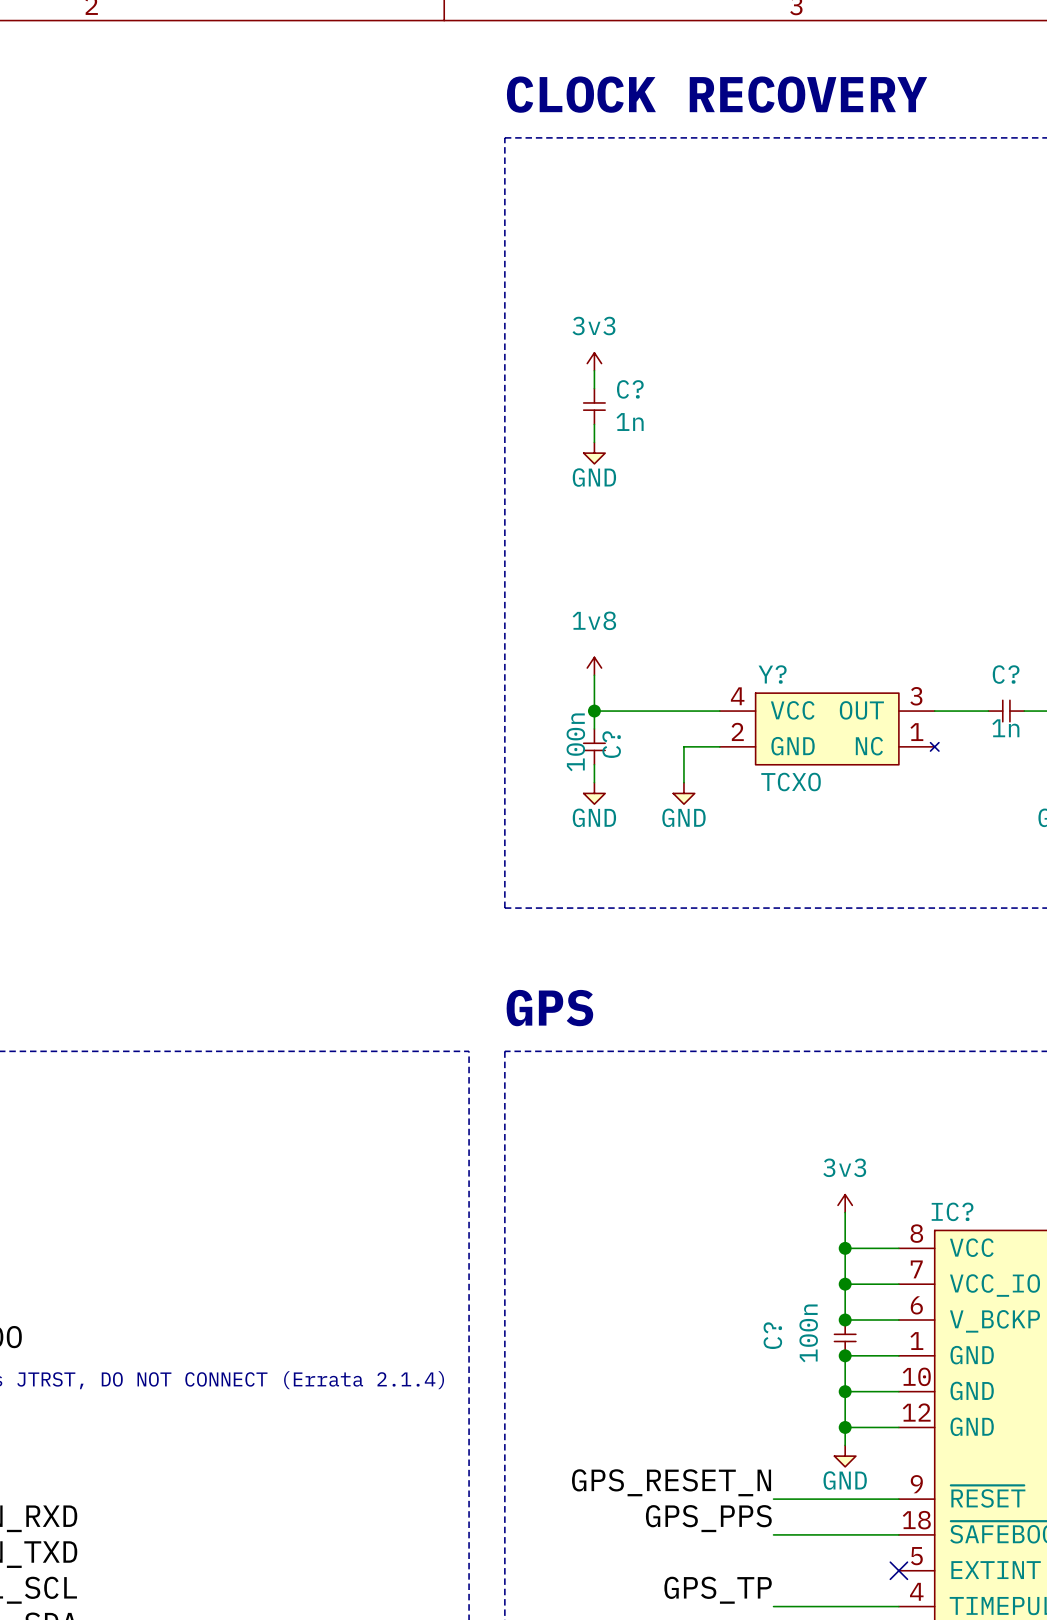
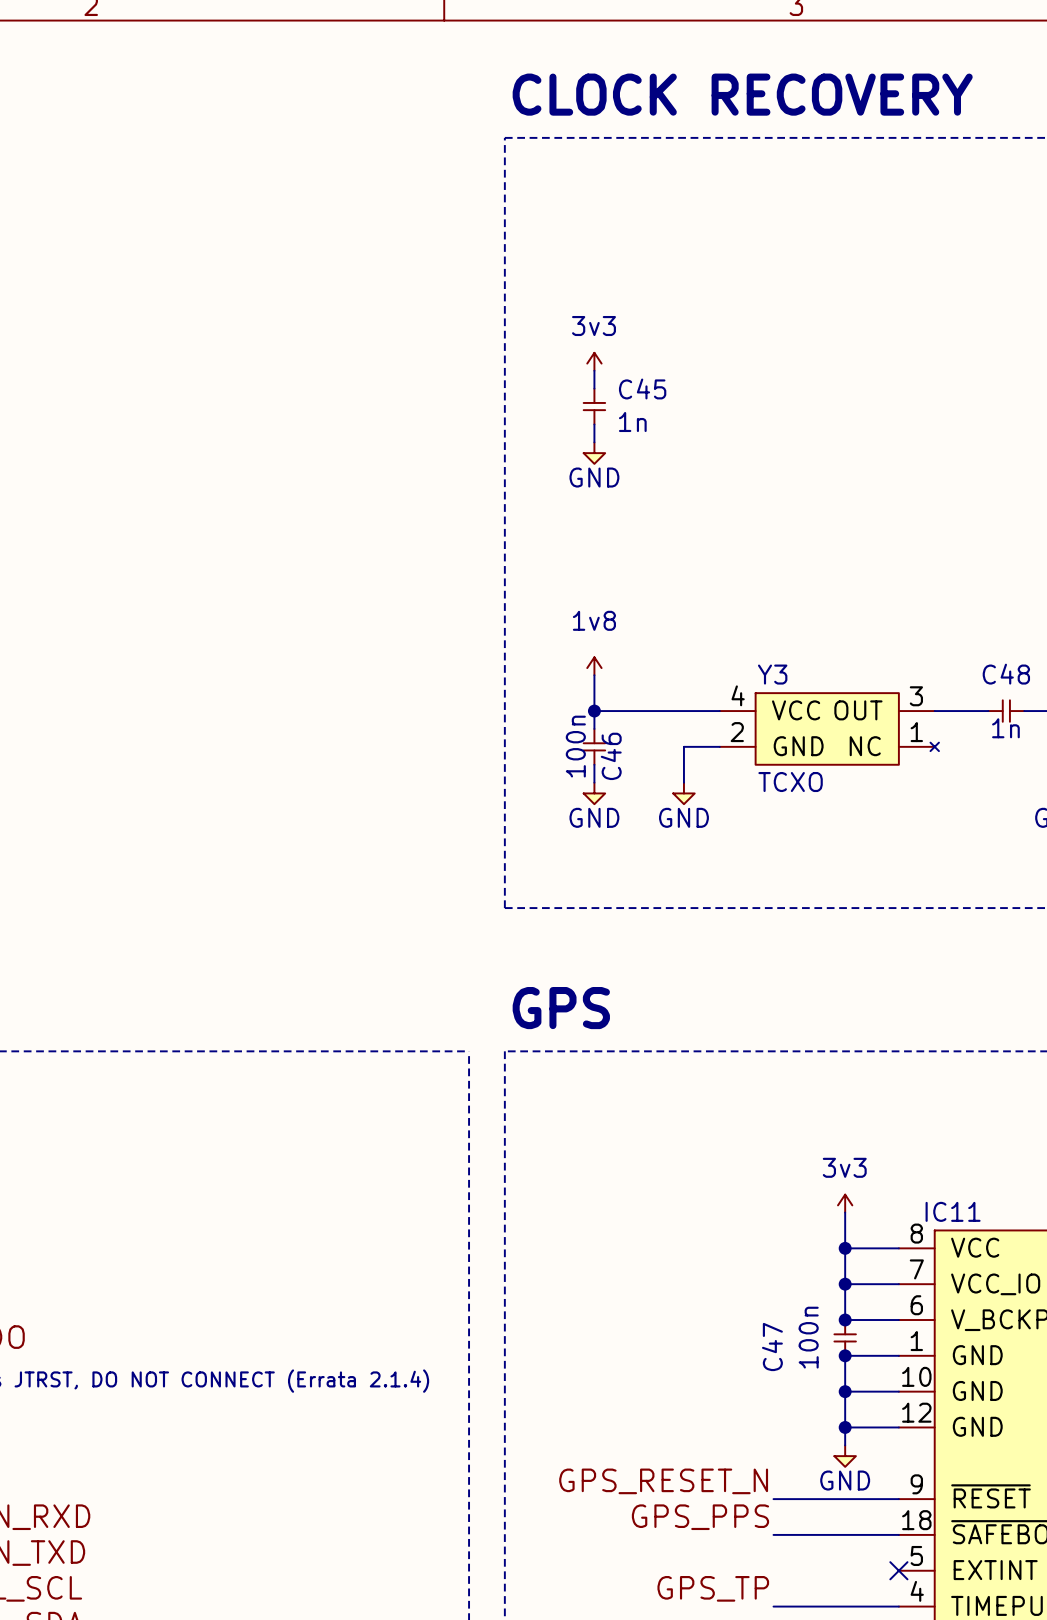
C? name: C? (630, 389) -> C45 (642, 388)
Y? name: Y? (772, 674) -> Y3 (772, 674)
C? name: C? (1006, 674) -> C48 (1006, 674)
C? name: C? (611, 744) -> C46 (611, 756)
IC? name: IC? (952, 1211) -> IC11 (953, 1211)
C? name: C? (772, 1335) -> C47 (772, 1347)

